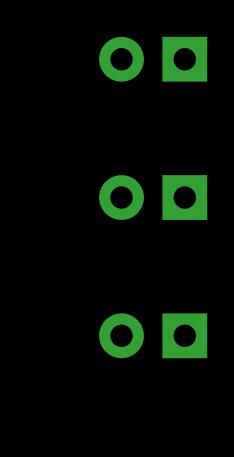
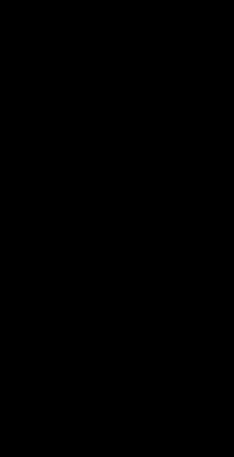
part: (153, 59) -> none
part: (153, 197) -> none
part: (153, 335) -> none

